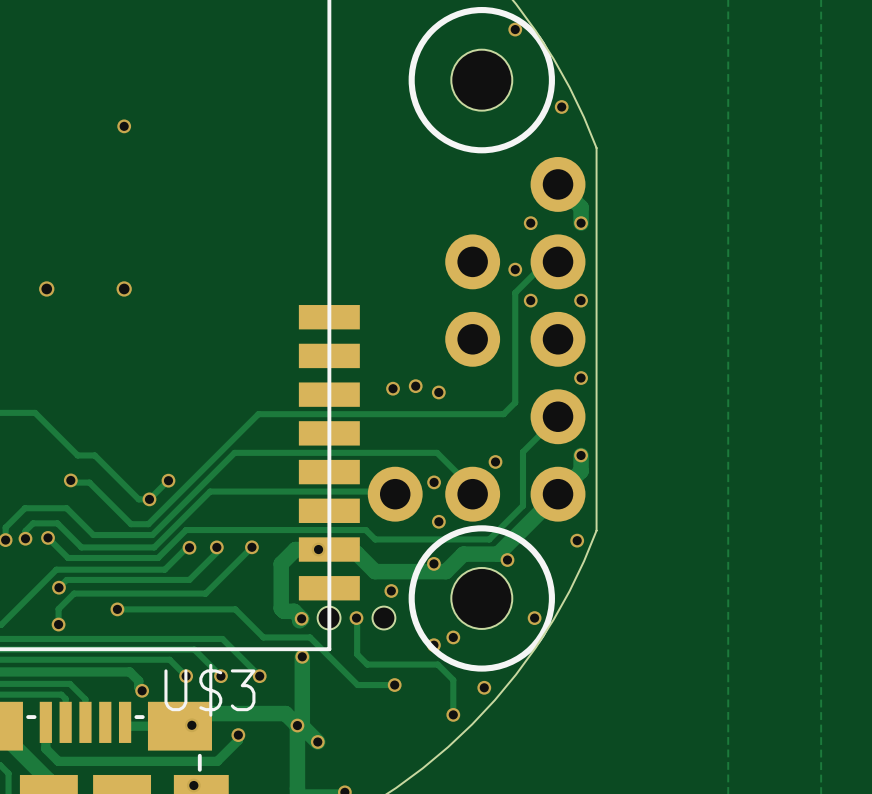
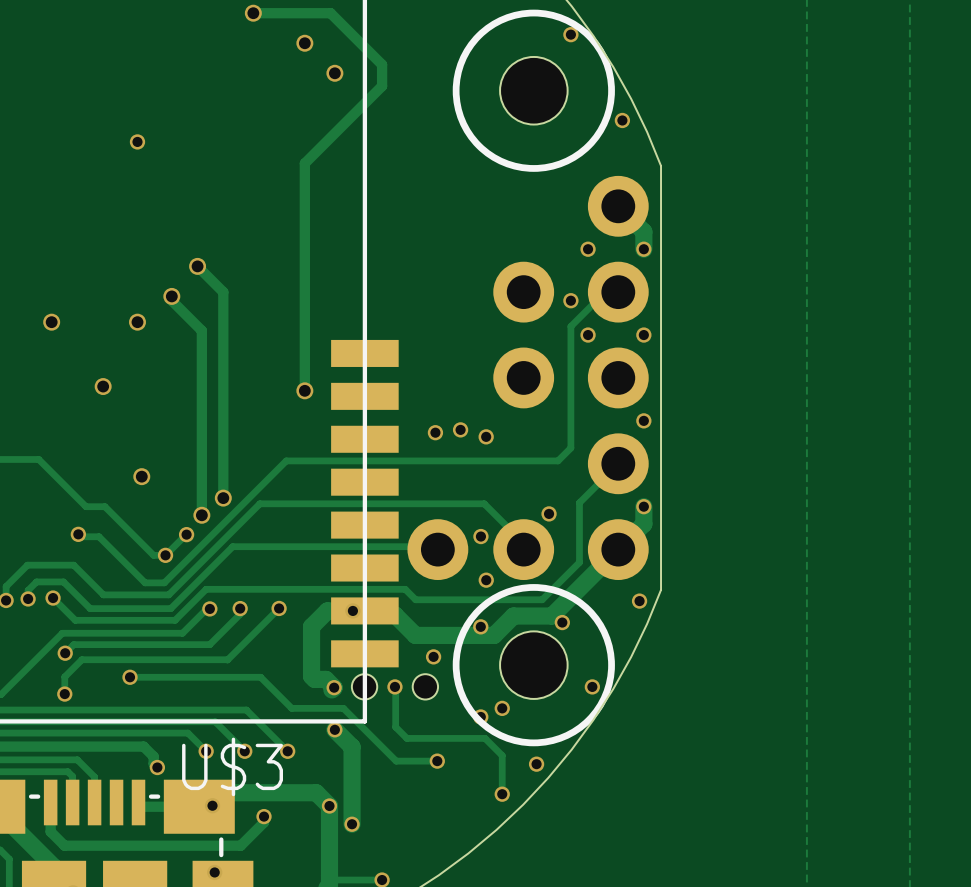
track: none -> (253, 13) (330, 13) (382, 64) (382, 86) (304, 163) (304, 390)
via: none -> (253, 13)
via: none -> (304, 43)
via: none -> (334, 73)
track: none -> (197, 266) (223, 292) (223, 498)
via: none -> (197, 266)
track: none -> (171, 296) (171, 300) (201, 330) (201, 515)
via: none -> (171, 296)
via: none -> (103, 386)
via: none -> (304, 390)
via: none -> (141, 476)
via: none -> (223, 498)
via: none -> (201, 515)
track: (302, 656) (302, 726) (317, 741) -> (334, 729) (352, 746) (352, 824)

